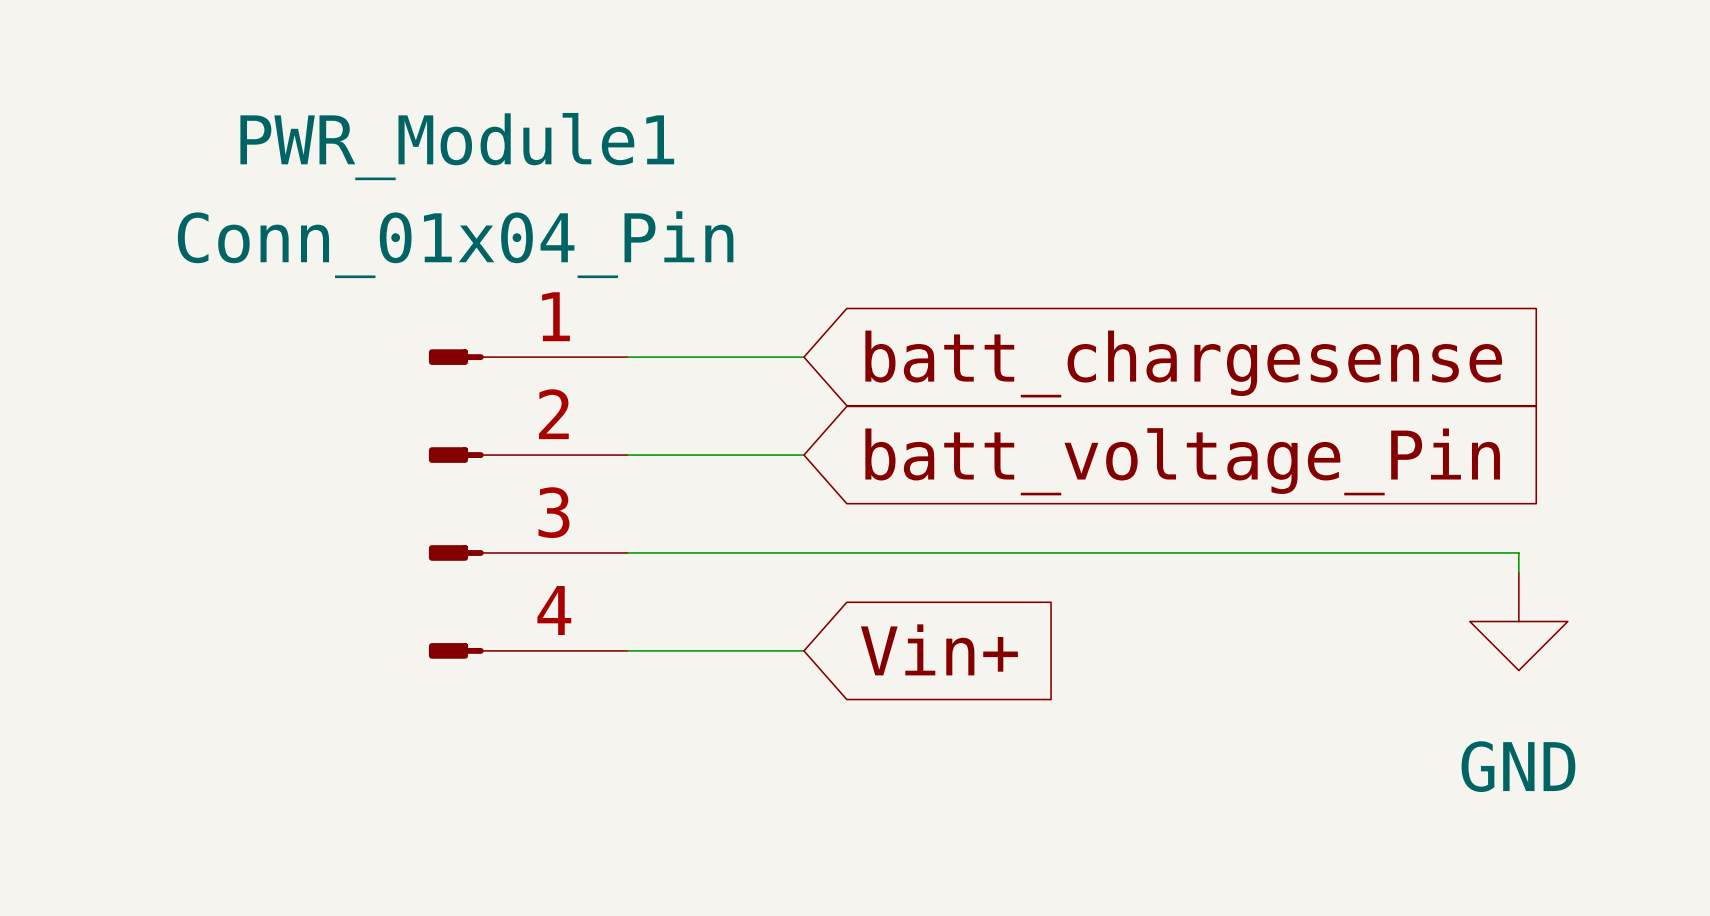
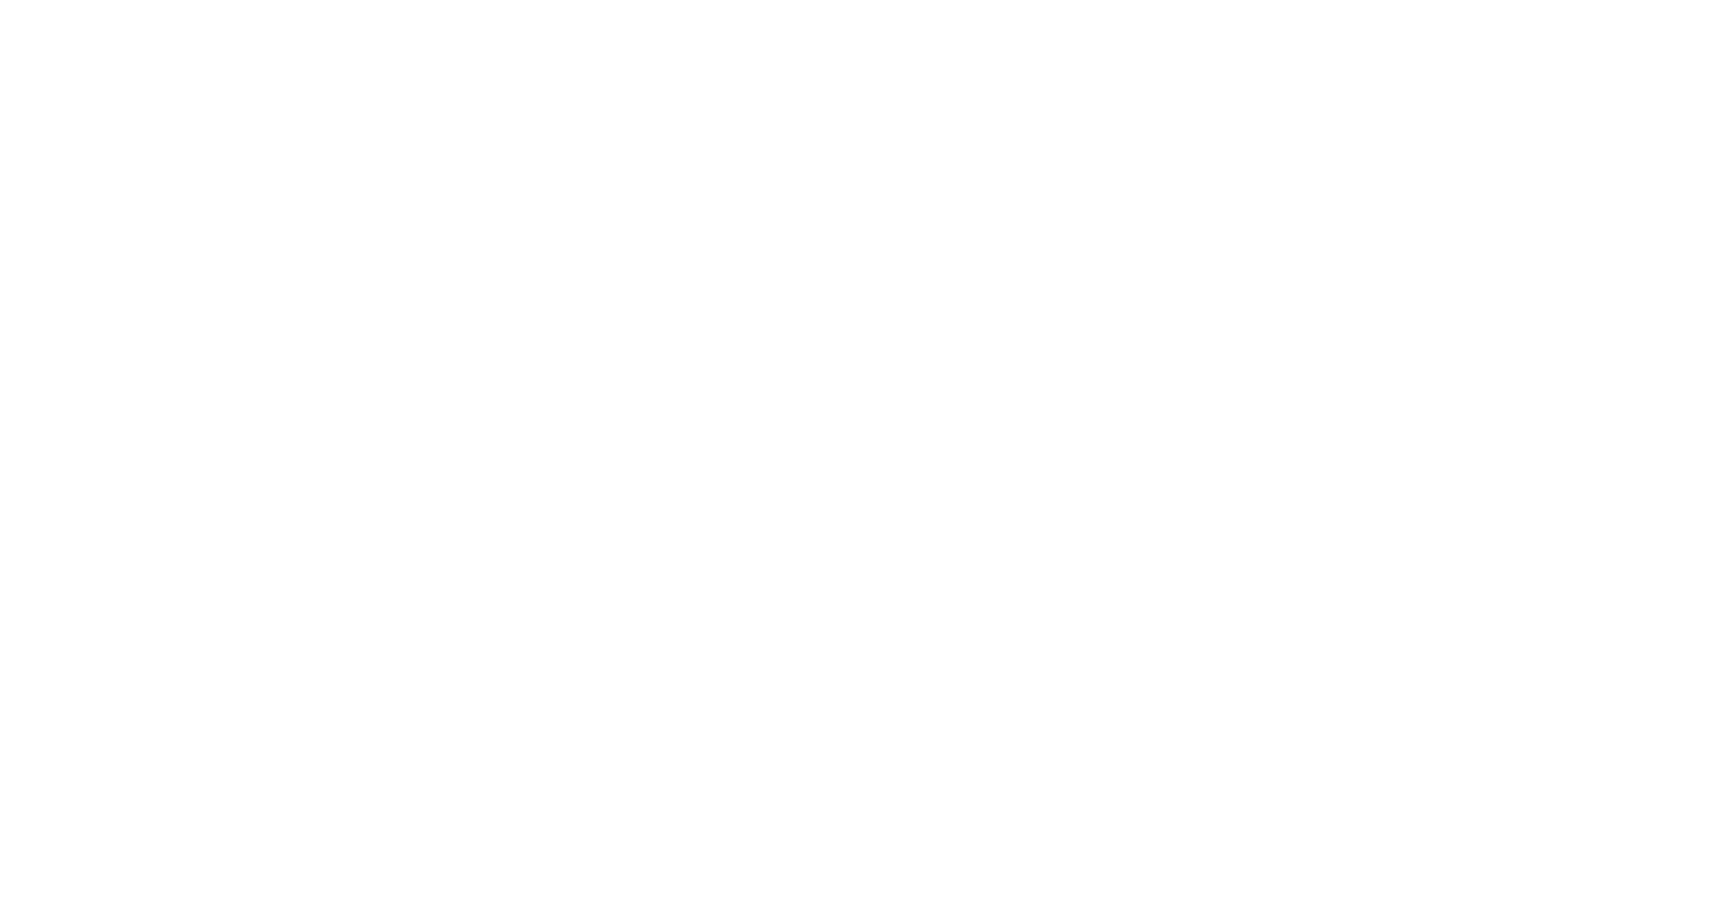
wire: (627, 357) (803, 357) -> none
global label: batt_chargesense (1183, 364) -> none
wire: (627, 455) (803, 455) -> none
global label: batt_voltage_Pin (1182, 461) -> none
PWR_Module1: Conn_01x04_Pin (528, 504) -> none
wire: (627, 552) (1518, 552) (1518, 572) -> none
power symbol: GND (1518, 621) -> none
global label: Vin+ (939, 649) -> none
wire: (627, 650) (803, 650) -> none

